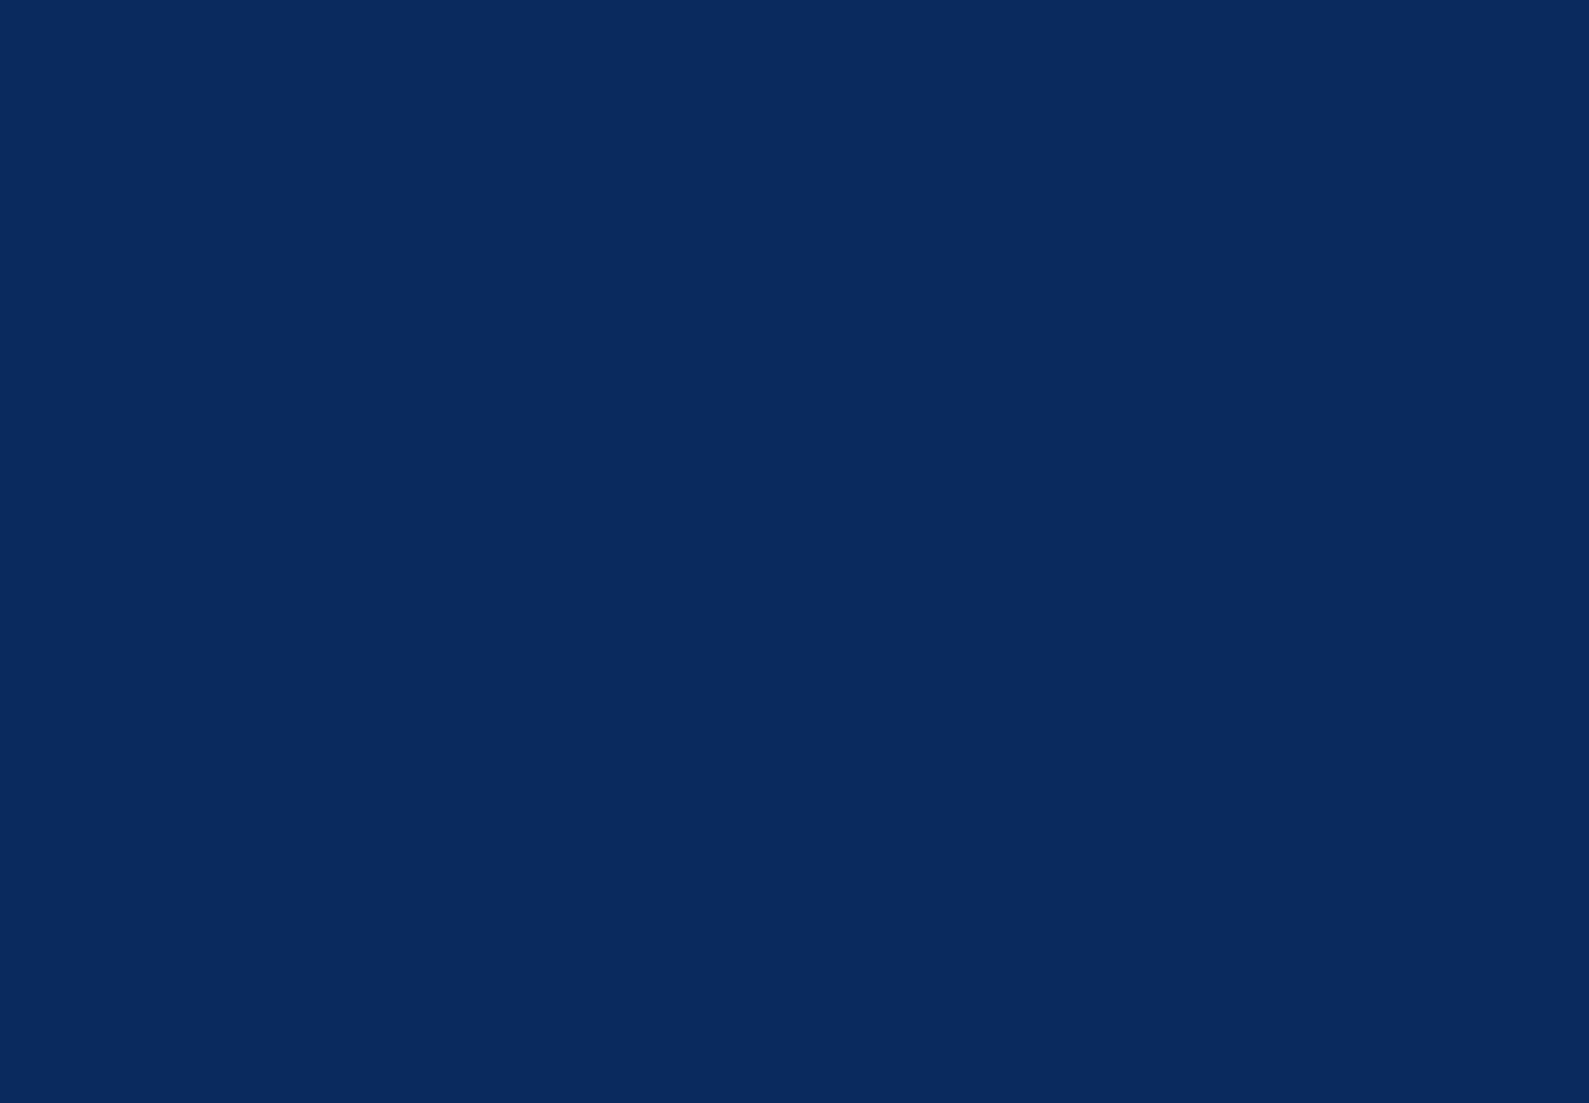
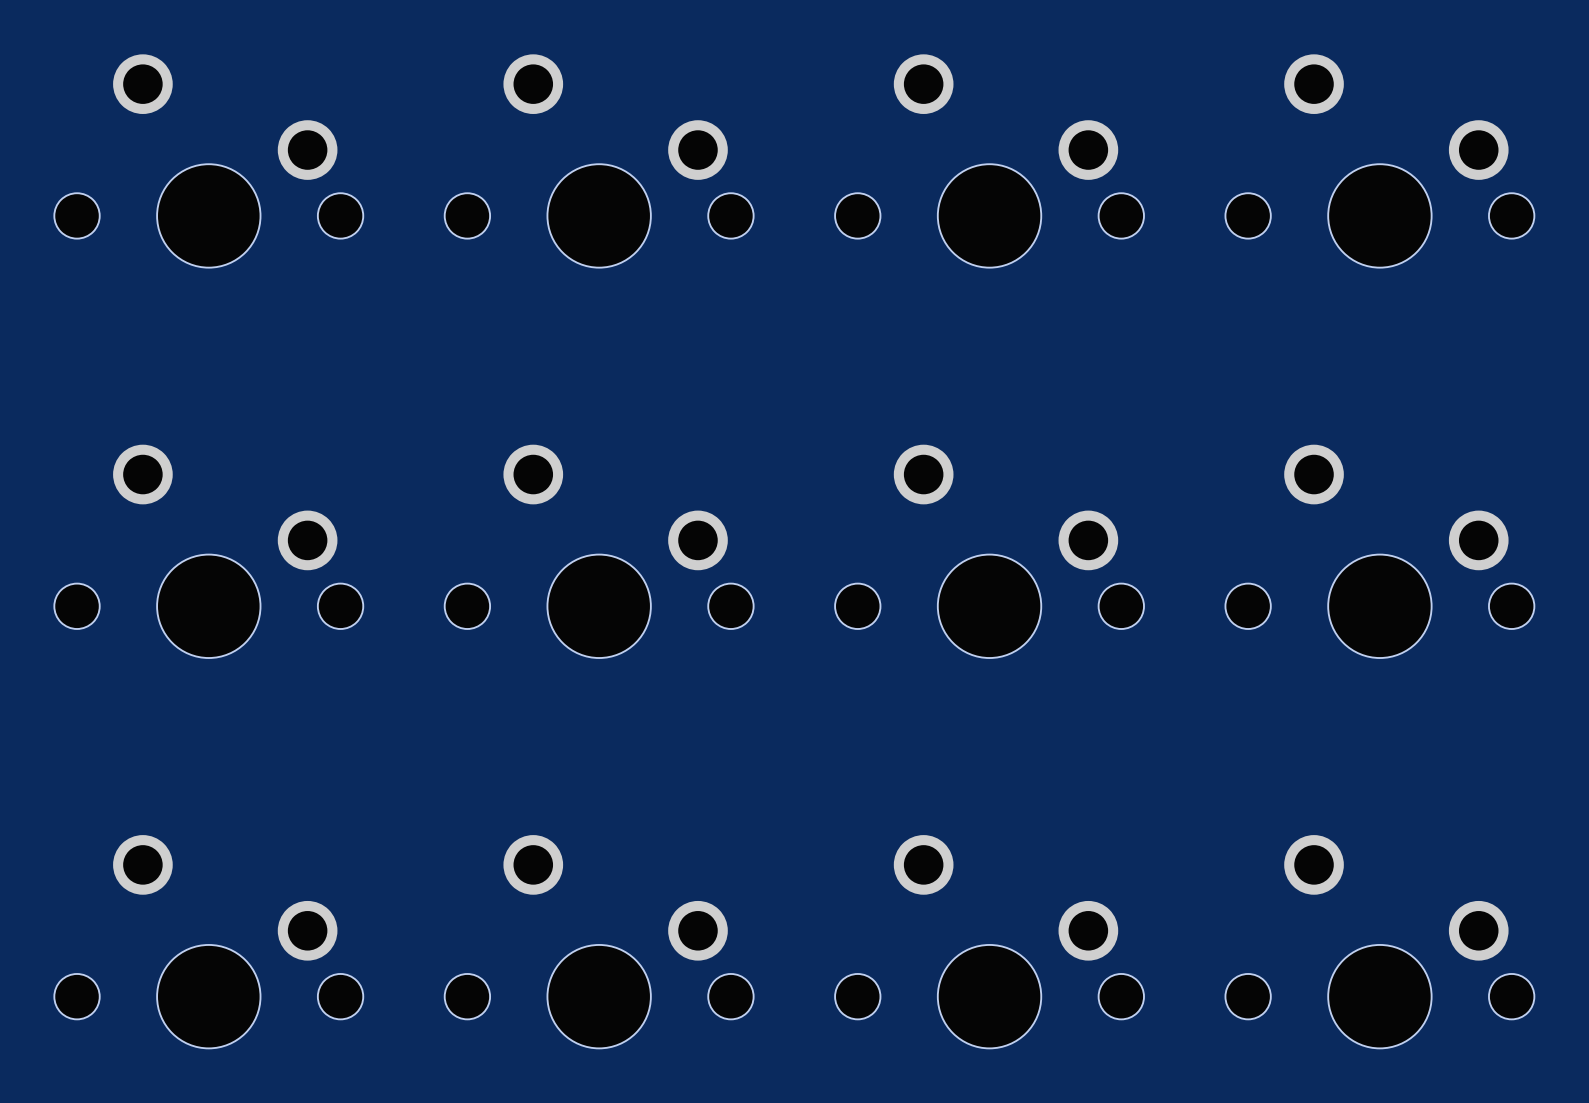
part: none -> (208, 160)
part: none -> (599, 160)
part: none -> (989, 160)
part: none -> (1379, 160)
part: none -> (208, 551)
part: none -> (599, 551)
part: none -> (989, 551)
part: none -> (1379, 551)
part: none -> (208, 941)
part: none -> (599, 941)
part: none -> (989, 941)
part: none -> (1379, 941)

